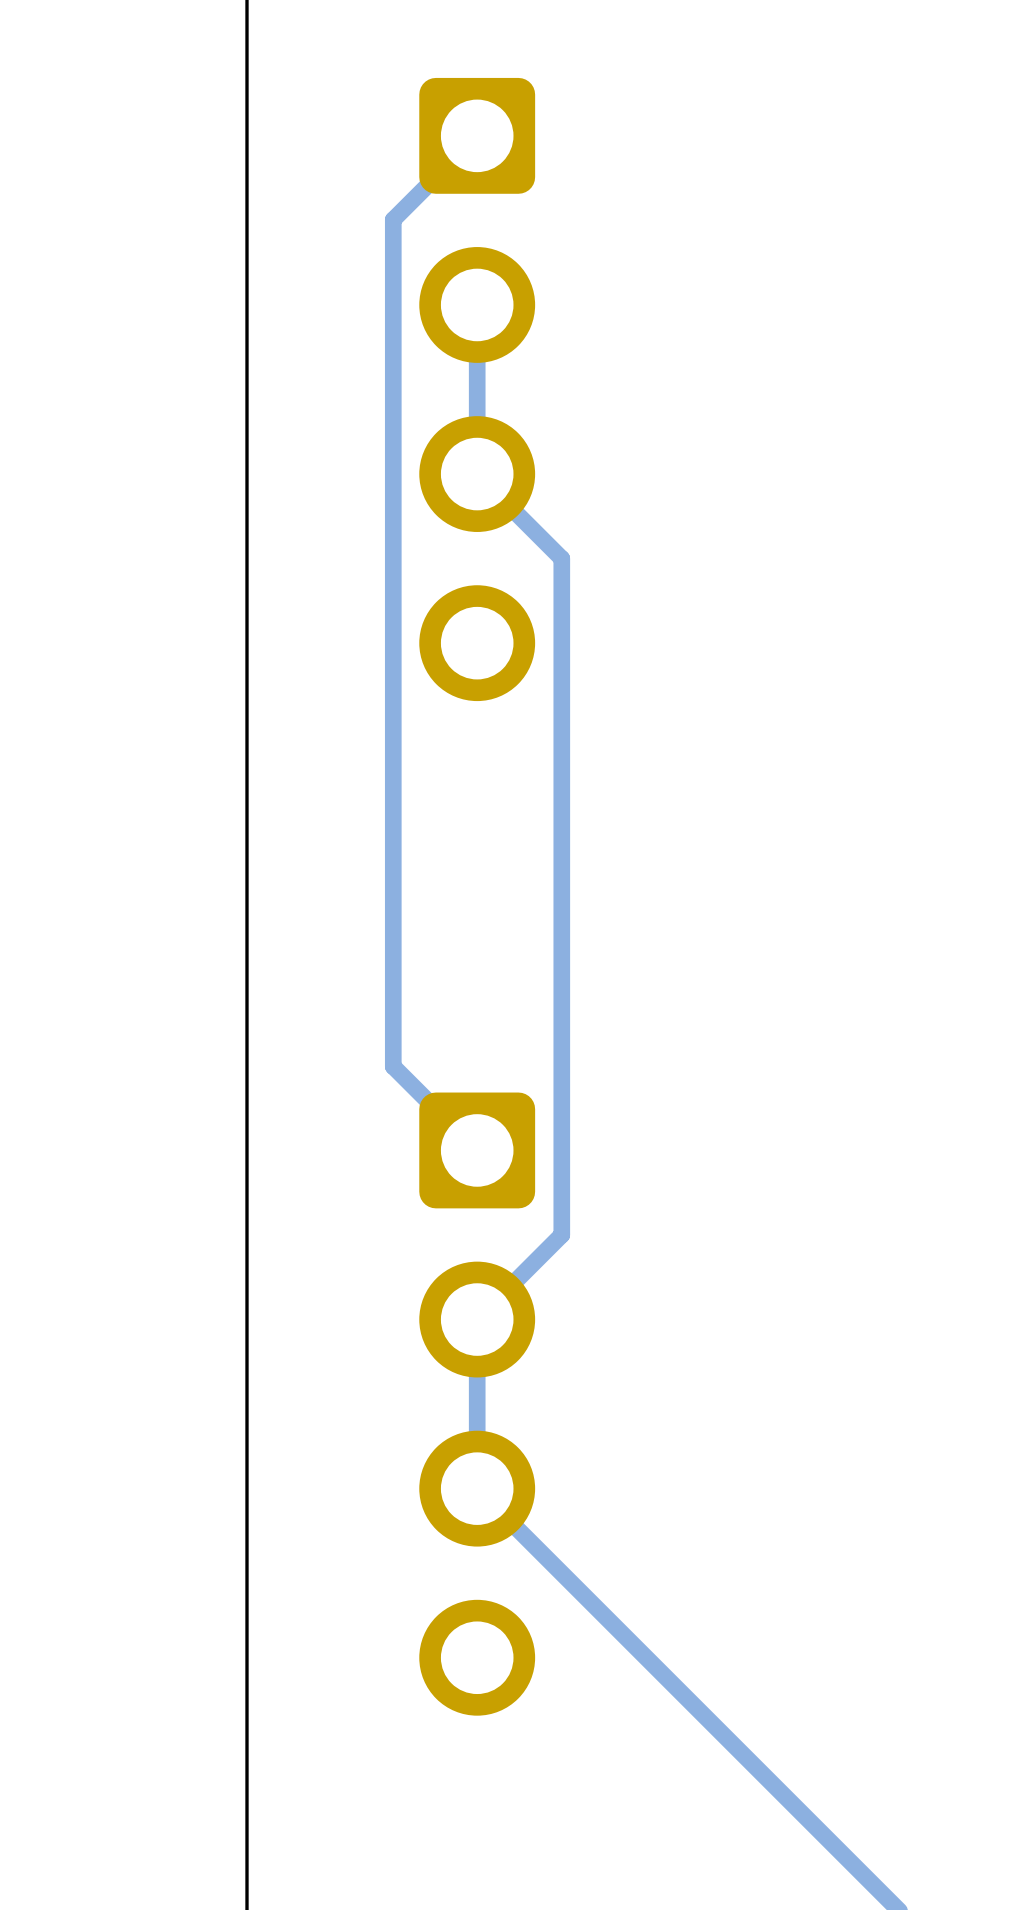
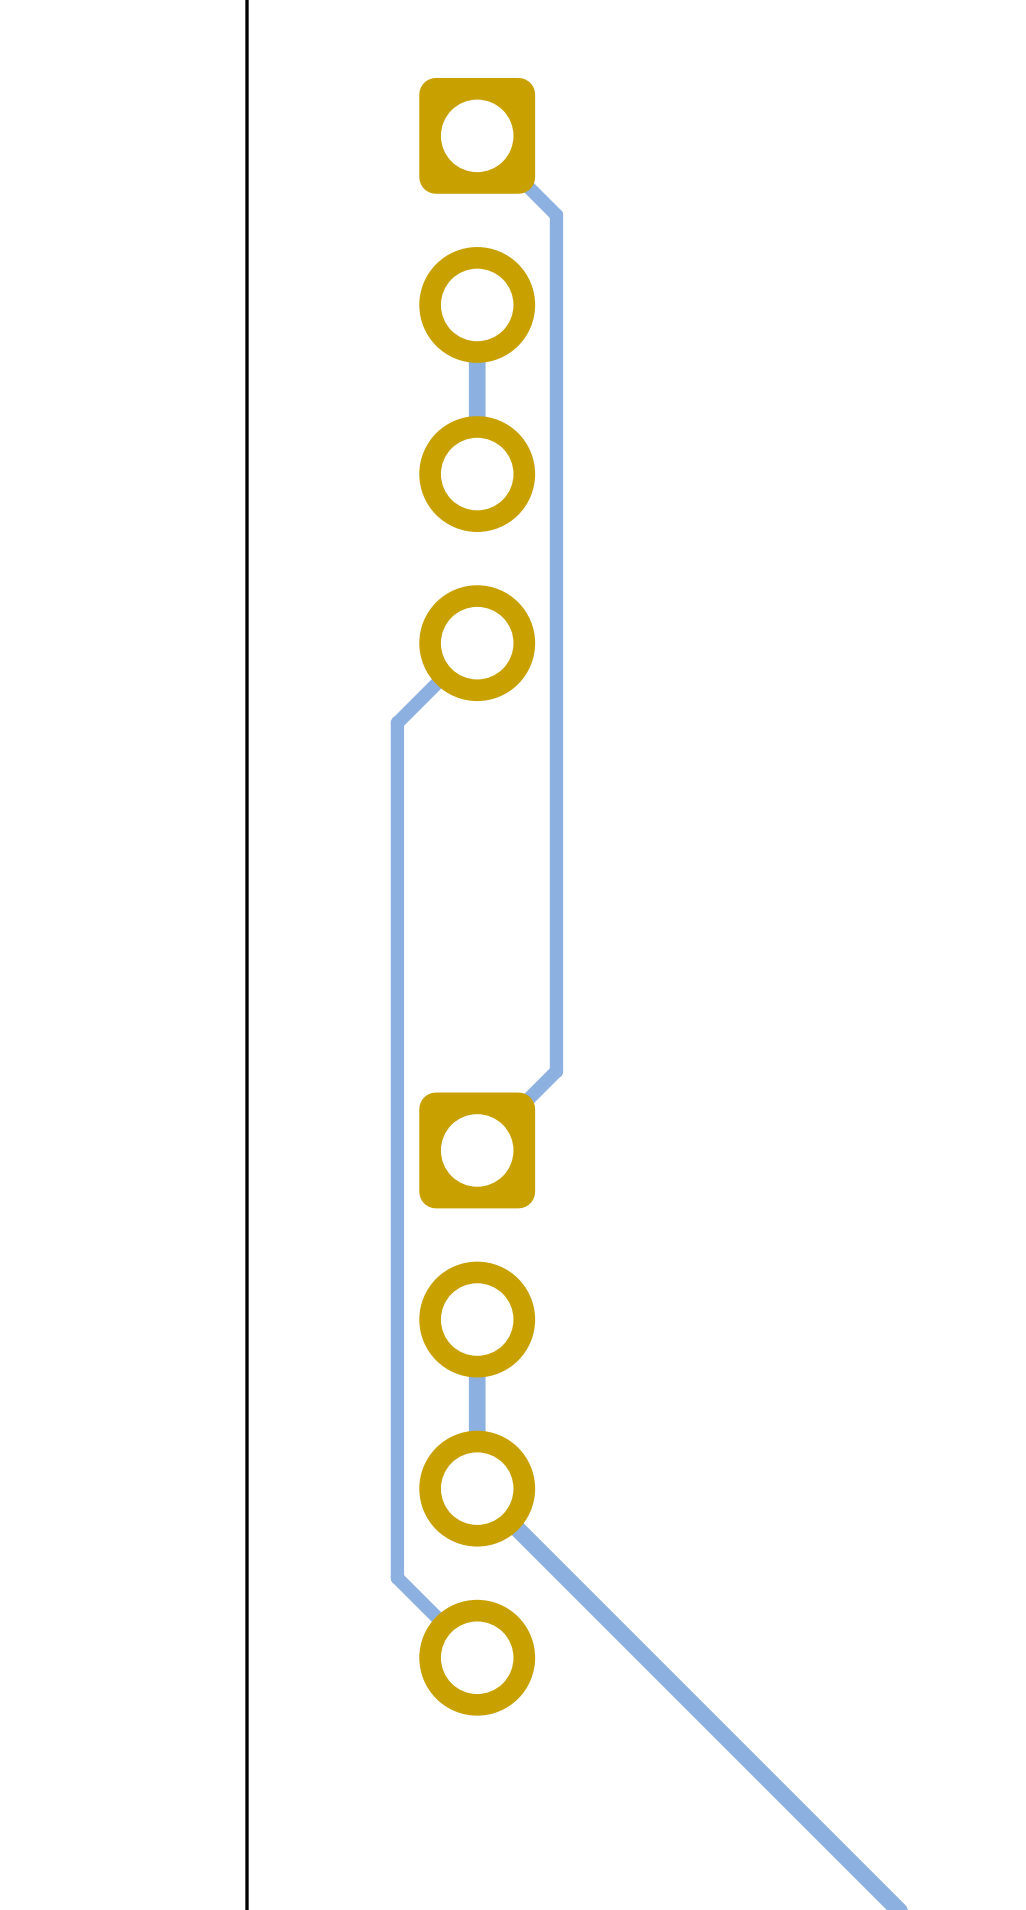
track: (477, 135) (393, 219) (393, 1066) (477, 1150) -> (477, 135) (556, 215) (556, 1071) (477, 1150)
track: (477, 474) (561, 558) (561, 1234) (477, 1319) -> none
track: none -> (477, 643) (397, 722) (397, 1577) (477, 1657)

